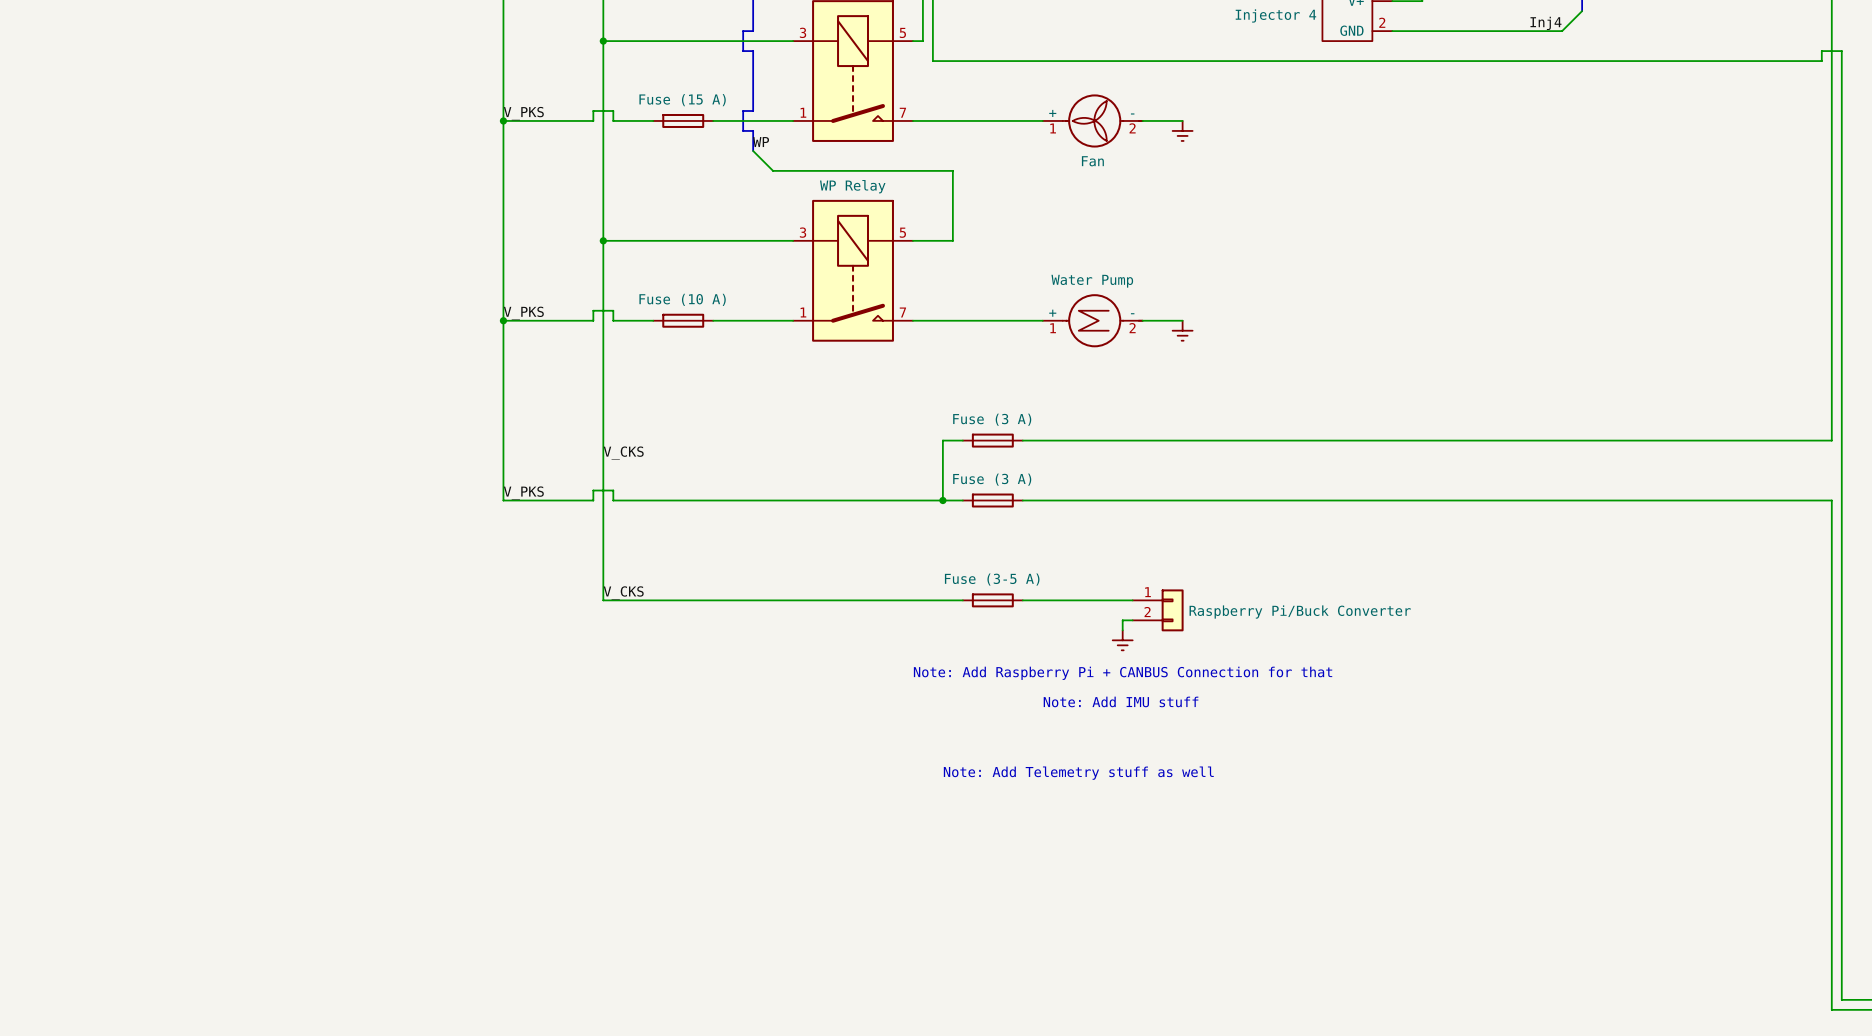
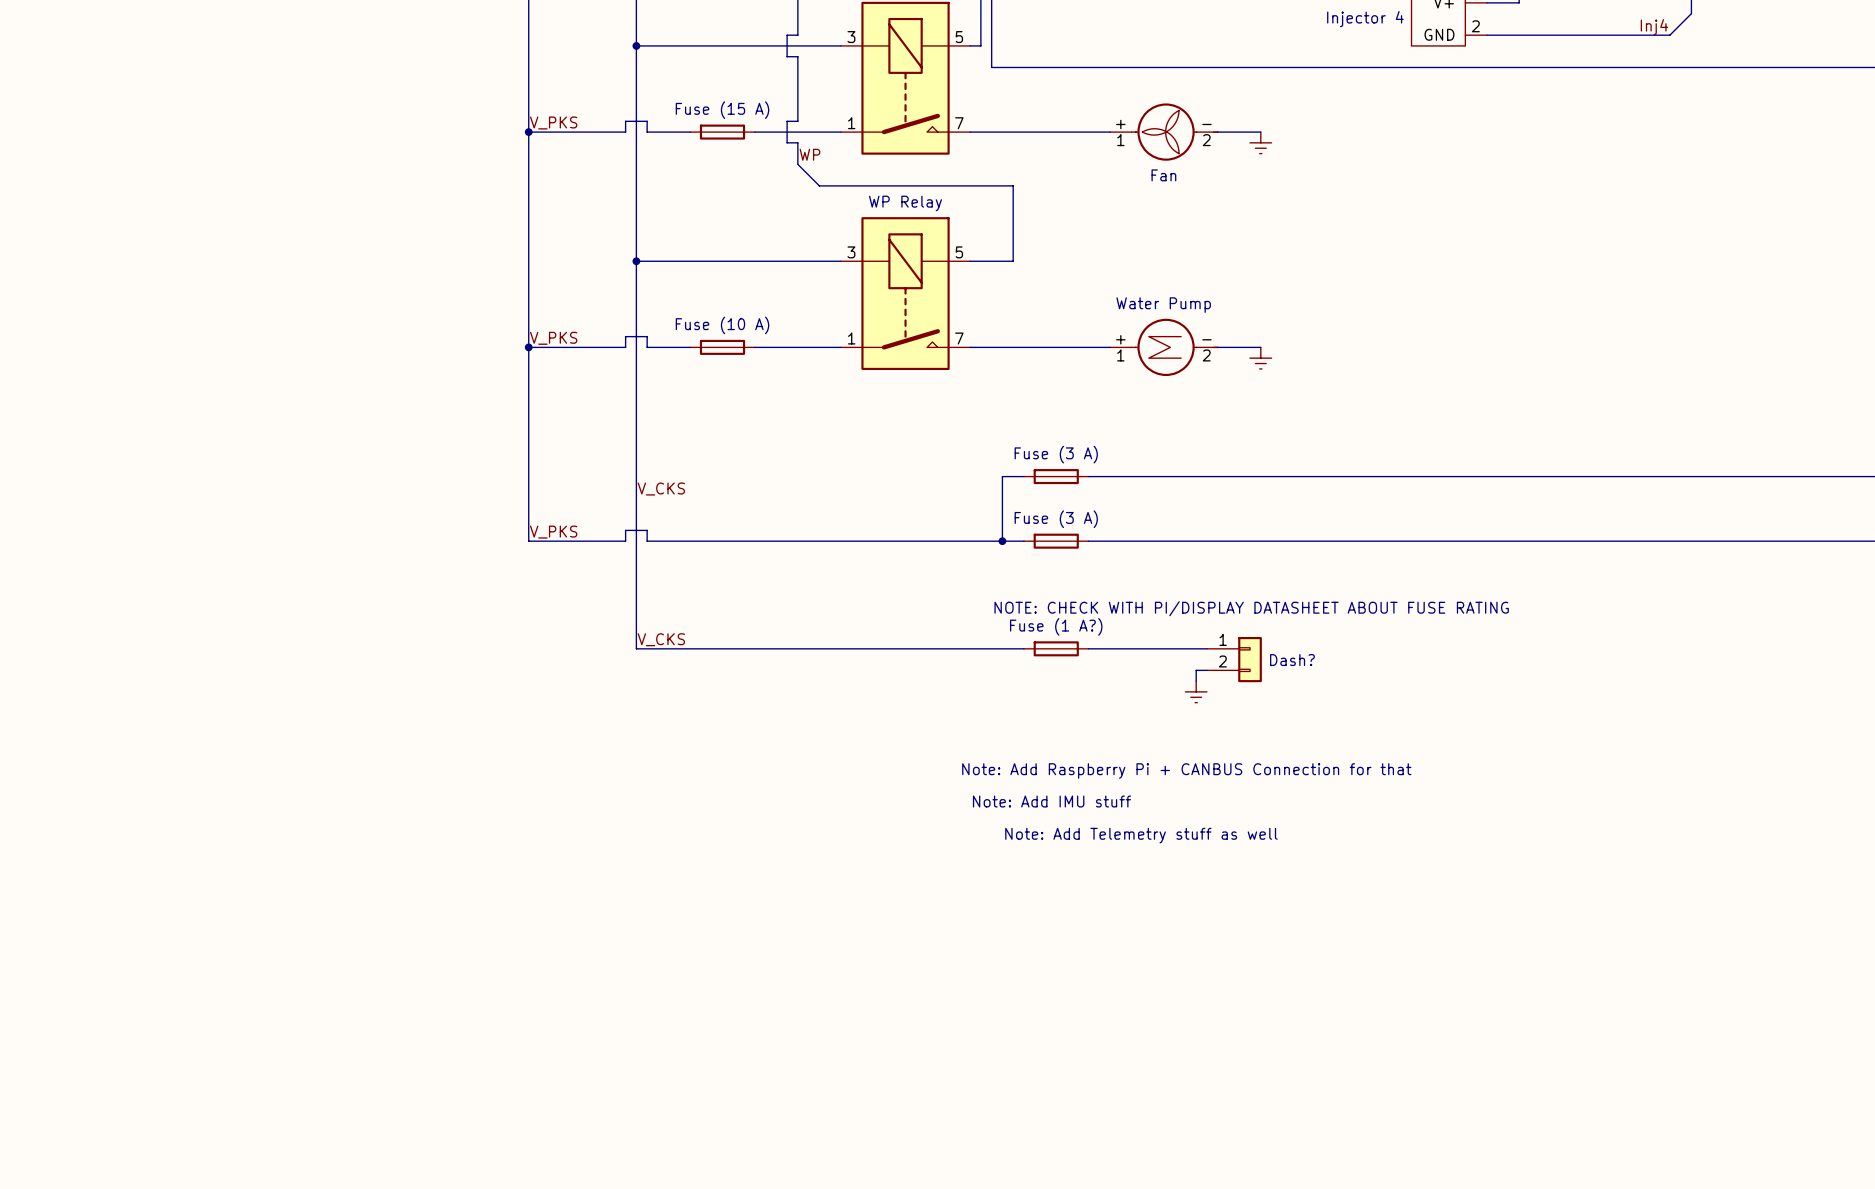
text: none -> NOTE: CHECK WITH PI/DISPLAY DATASHEET ABOUT FUSE RATING (1251, 608)
part value: Fuse (3-5 A) (992, 579) -> Fuse (1 A?) (1056, 626)
part value: Raspberry Pi/Buck Converter (1300, 612) -> Dash? (1292, 660)
text position: Note: Add Raspberry Pi + CANBUS Connection for that (1123, 673) -> Note: Add Raspberry Pi + CANBUS Connection for that (1186, 771)
text position: Note: Add IMU stuff (1121, 701) -> Note: Add IMU stuff (1051, 801)

